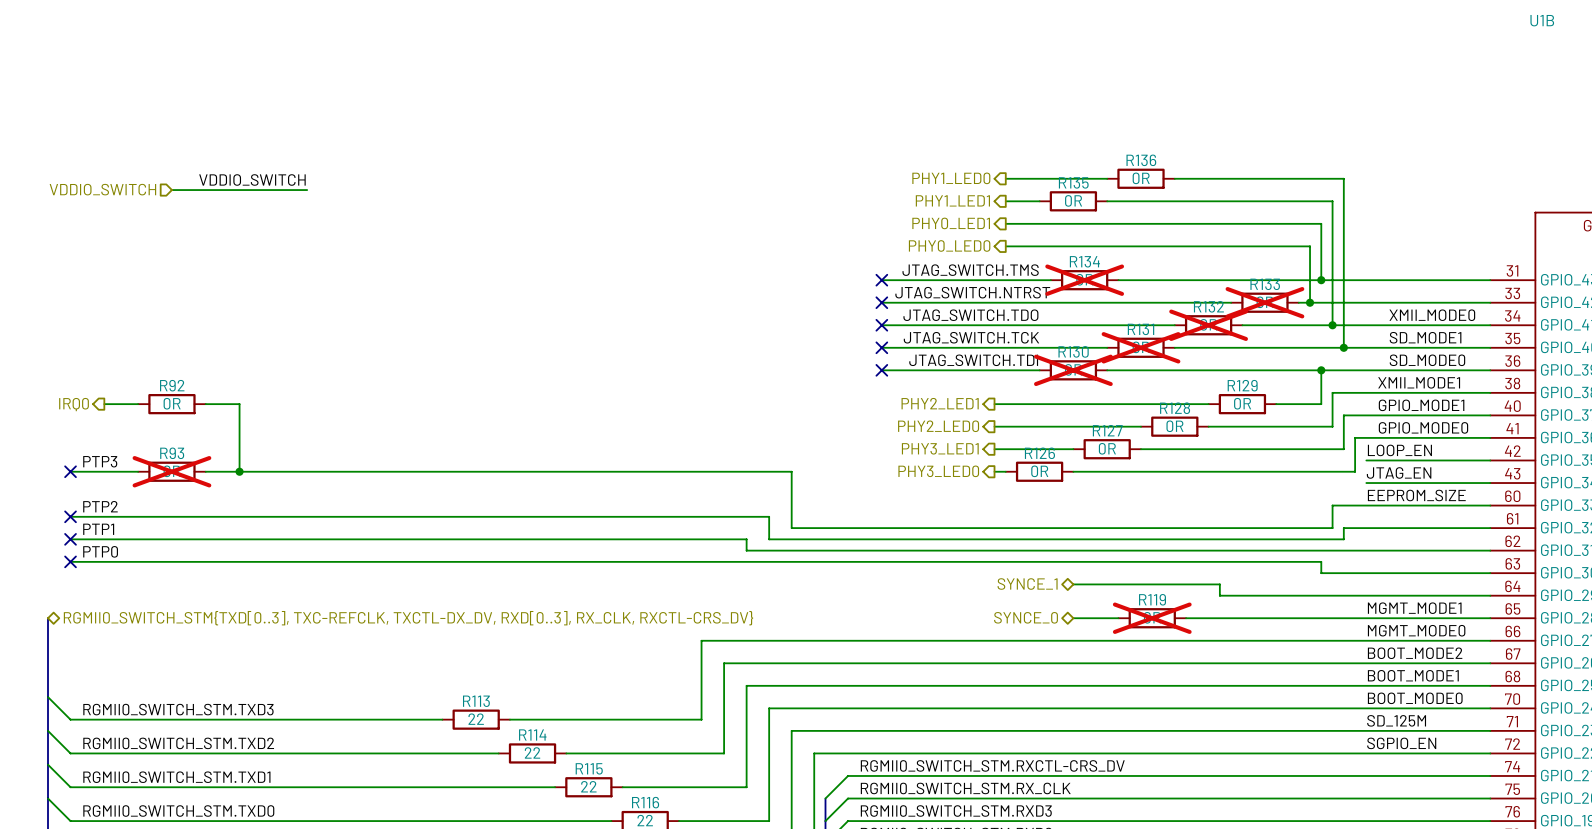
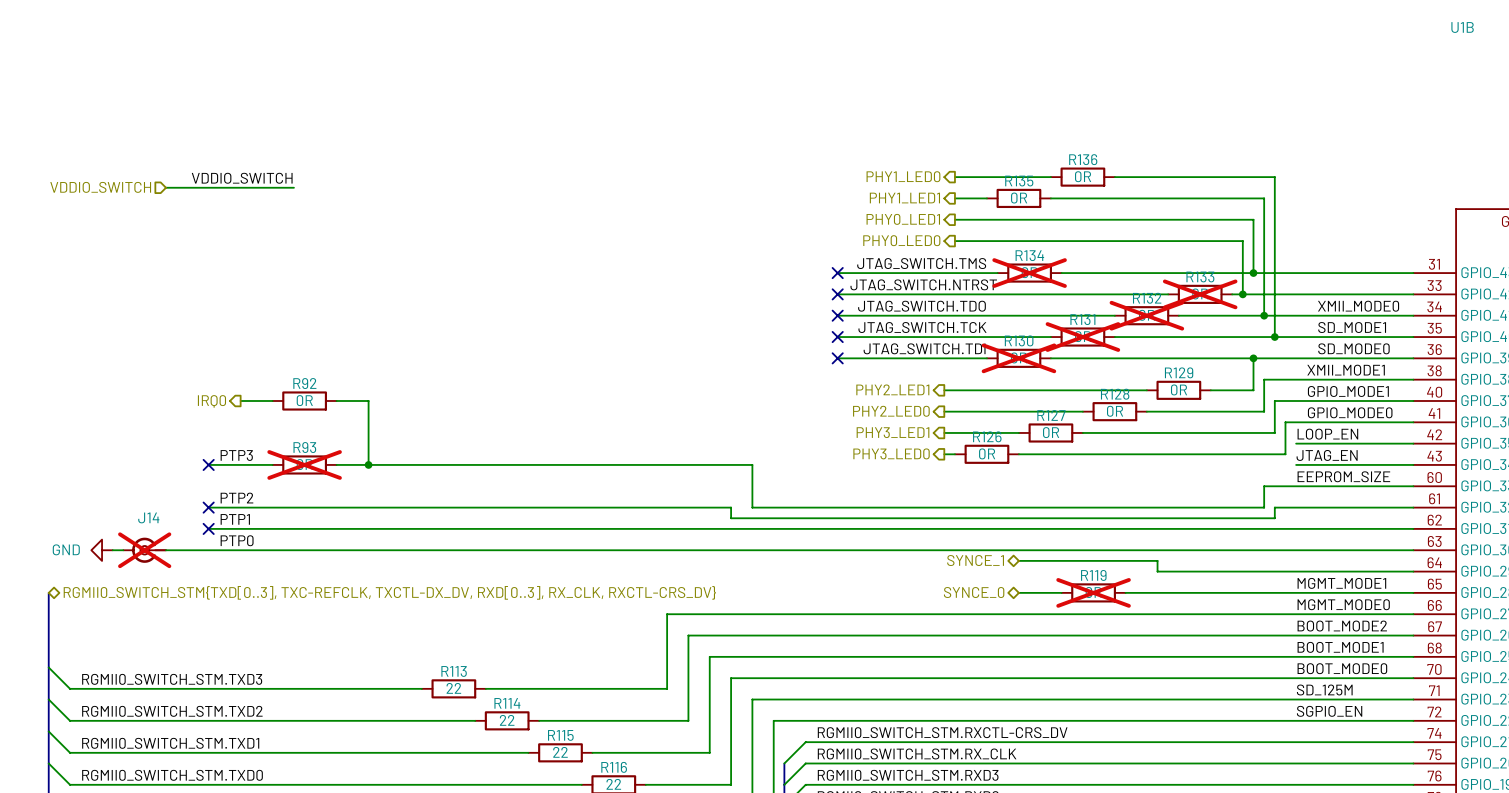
hierarchical label position: IRQ0 (74, 404) -> IRQ0 (211, 401)
wire: (104, 404) (138, 404) -> (240, 400) (272, 400)
R92 position: (171, 404) -> (304, 400)
wire: (205, 404) (239, 404) (239, 471) -> (336, 400) (368, 400) (368, 464)
label position: PTP3 (100, 461) -> PTP3 (236, 455)
wire: (70, 471) (138, 471) -> (208, 464) (272, 464)
no-connect mark: (70, 471) -> none
R93 position: (171, 471) -> (304, 464)
wire: (205, 471) (791, 471) (791, 483) -> (336, 464) (752, 464)
junction: (239, 471) -> none
no-connect mark: none -> (208, 464)
junction: none -> (368, 464)
label position: PTP2 (100, 506) -> PTP2 (236, 498)
wire: (70, 516) (769, 516) (769, 528) -> (208, 507) (731, 507)
no-connect mark: (70, 516) -> none
no-connect mark: none -> (208, 507)
label position: PTP1 (98, 529) -> PTP1 (235, 519)
wire: (70, 539) (746, 539) (746, 550) -> (208, 528) (709, 528)
no-connect mark: (70, 539) -> none
no-connect mark: none -> (208, 528)
label position: PTP0 (100, 551) -> PTP0 (237, 540)
wire: (70, 561) (1321, 561) (1321, 573) -> (166, 550) (1253, 550)
no-connect mark: (70, 561) -> none
power symbol: none -> GND (102, 550)
wire: none -> (112, 550) (123, 550)
J14: none -> (144, 550)

